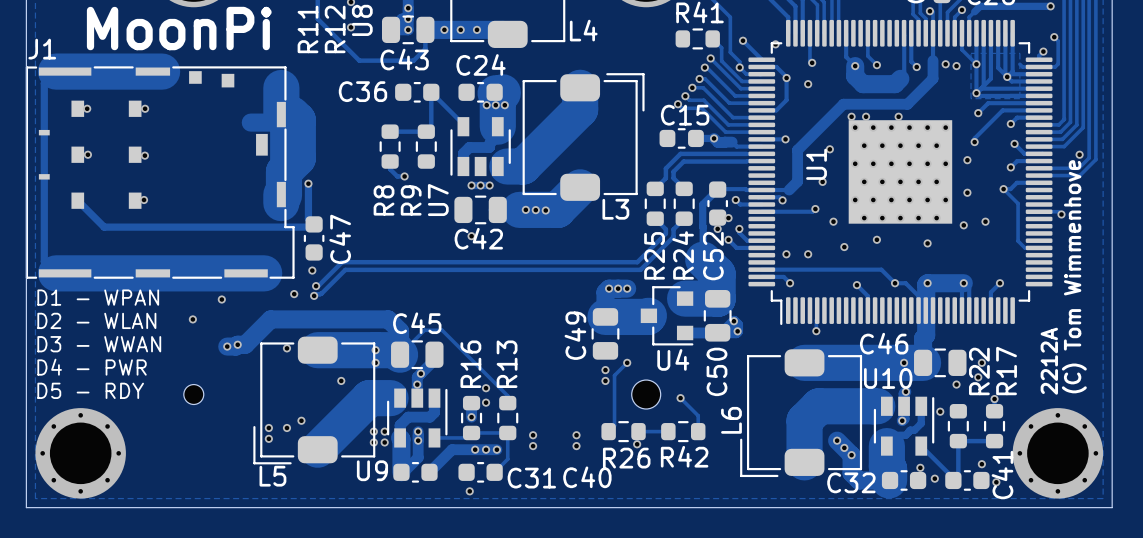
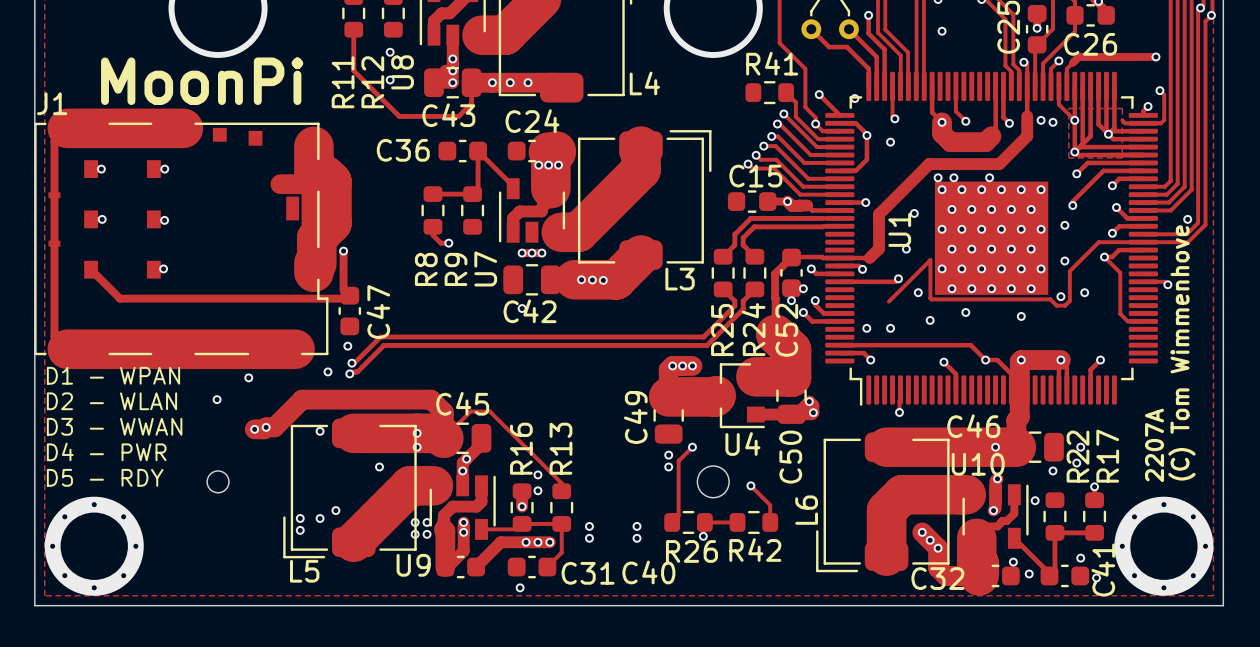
track: none -> (1143, 242) (1098, 242) (1069, 271) (1069, 300) (1065, 305) (1056, 305) (1050, 299) (931, 299) (930, 260) (888, 301)
text: 2212A (1049, 361) -> 2207A (1154, 445)

